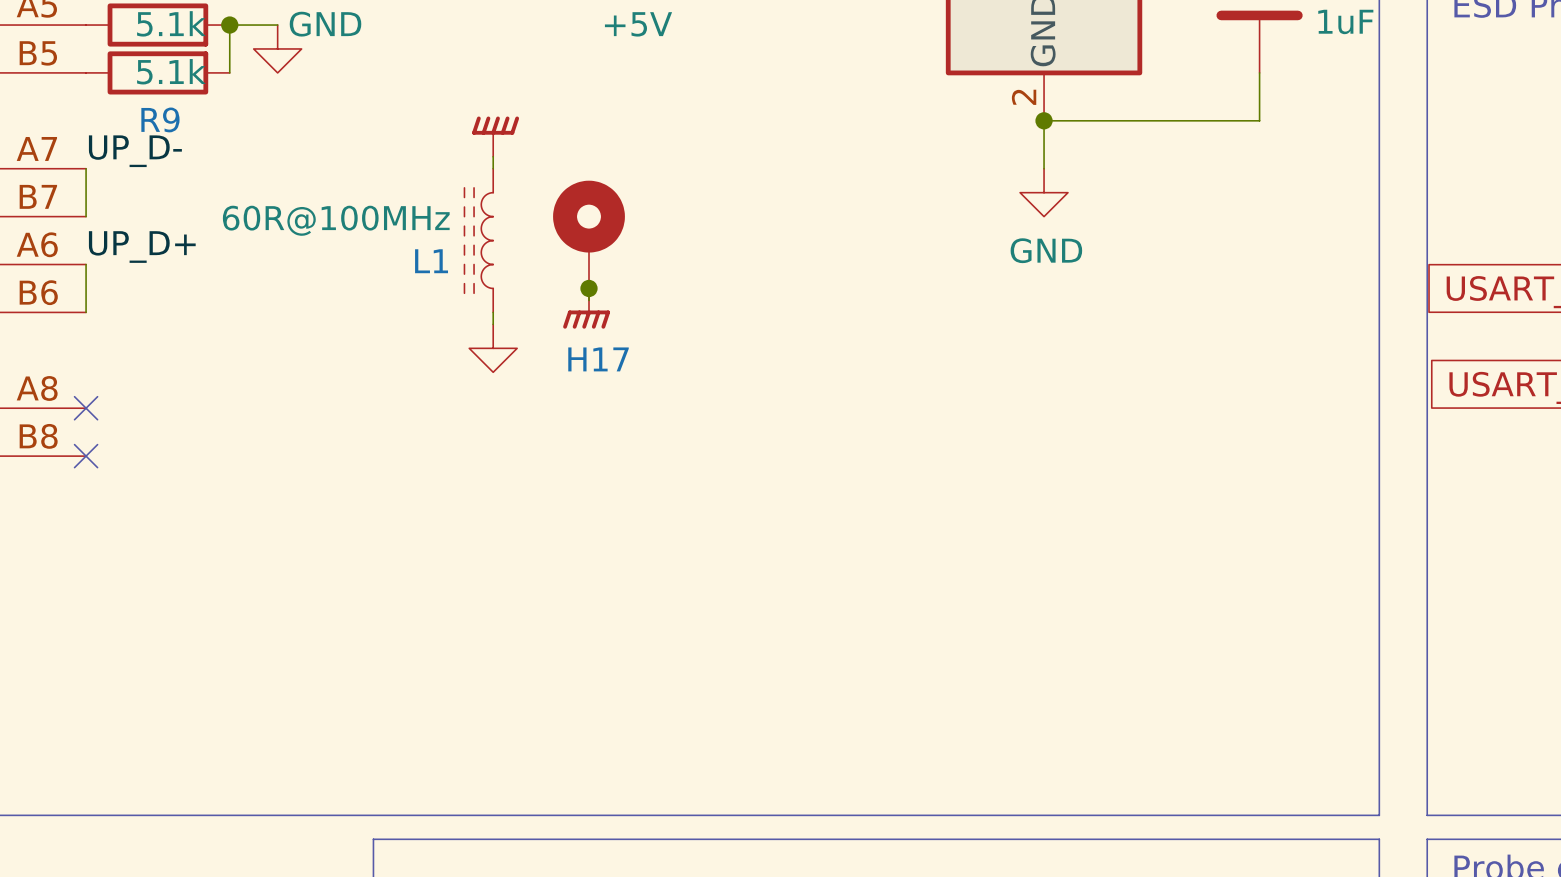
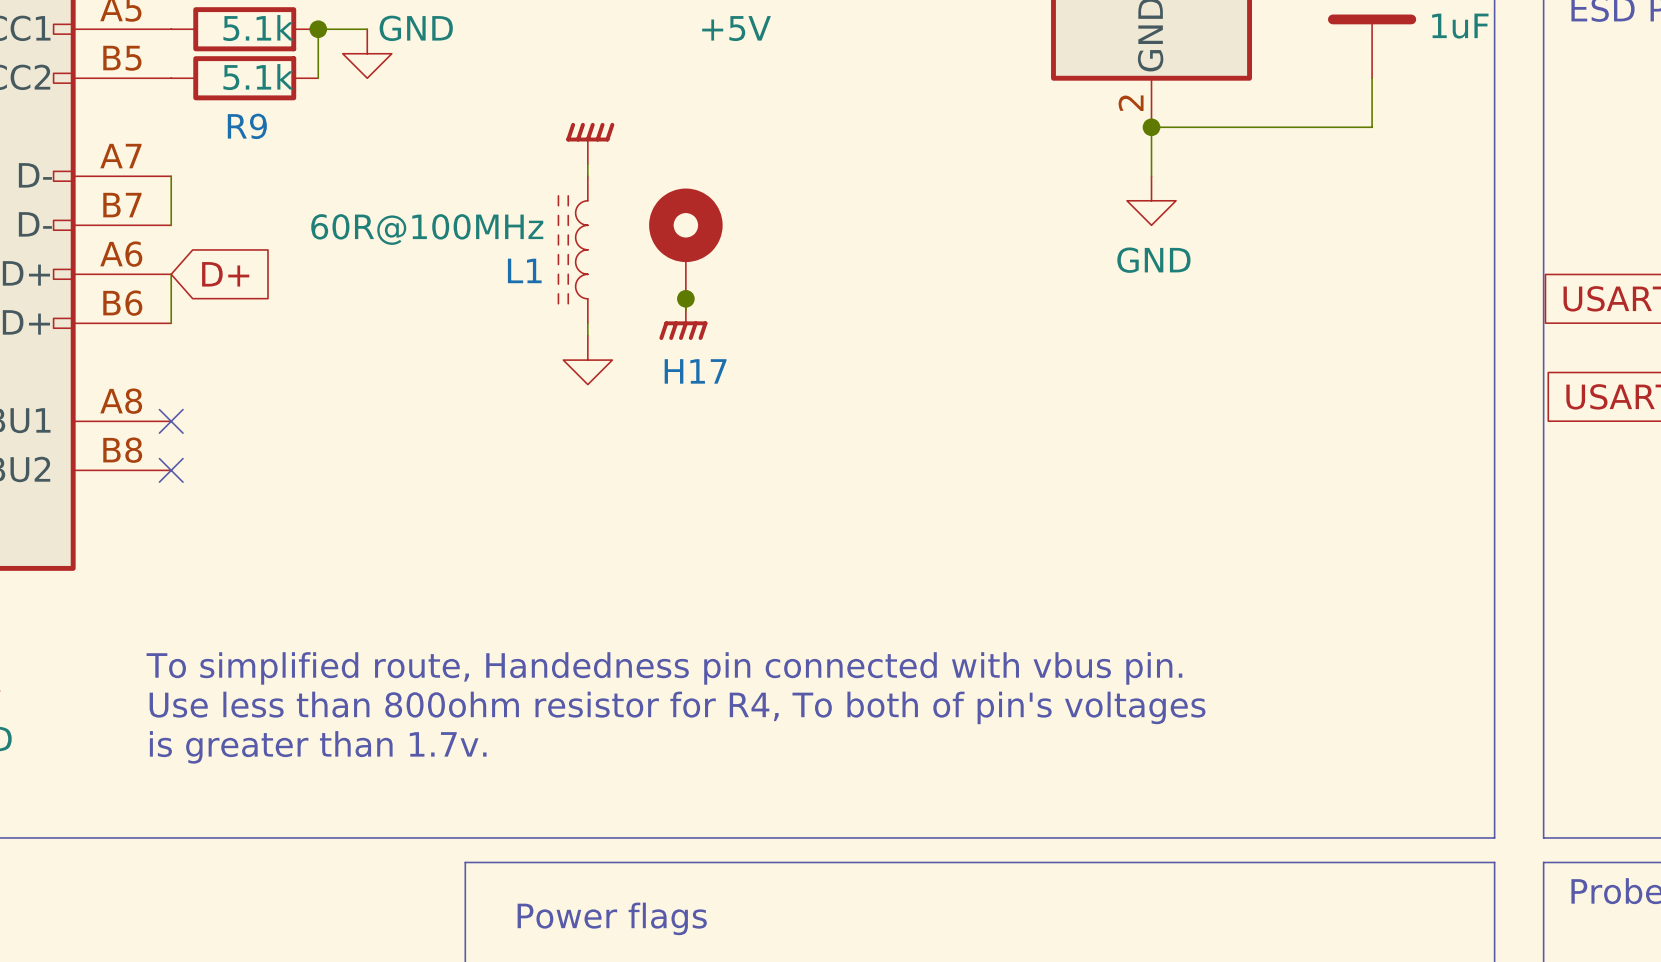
label: UP_D- (135, 151) -> none
label: UP_D+ (142, 247) -> none
global label: none -> D+ (225, 274)
text: none -> To simplified route, Handedness pin connected with vbus pin. (664, 668)
text: none -> Use less than 800ohm resistor for R4, To both of pin's voltages (677, 707)
text: none -> is greater than 1.7v. (318, 747)

